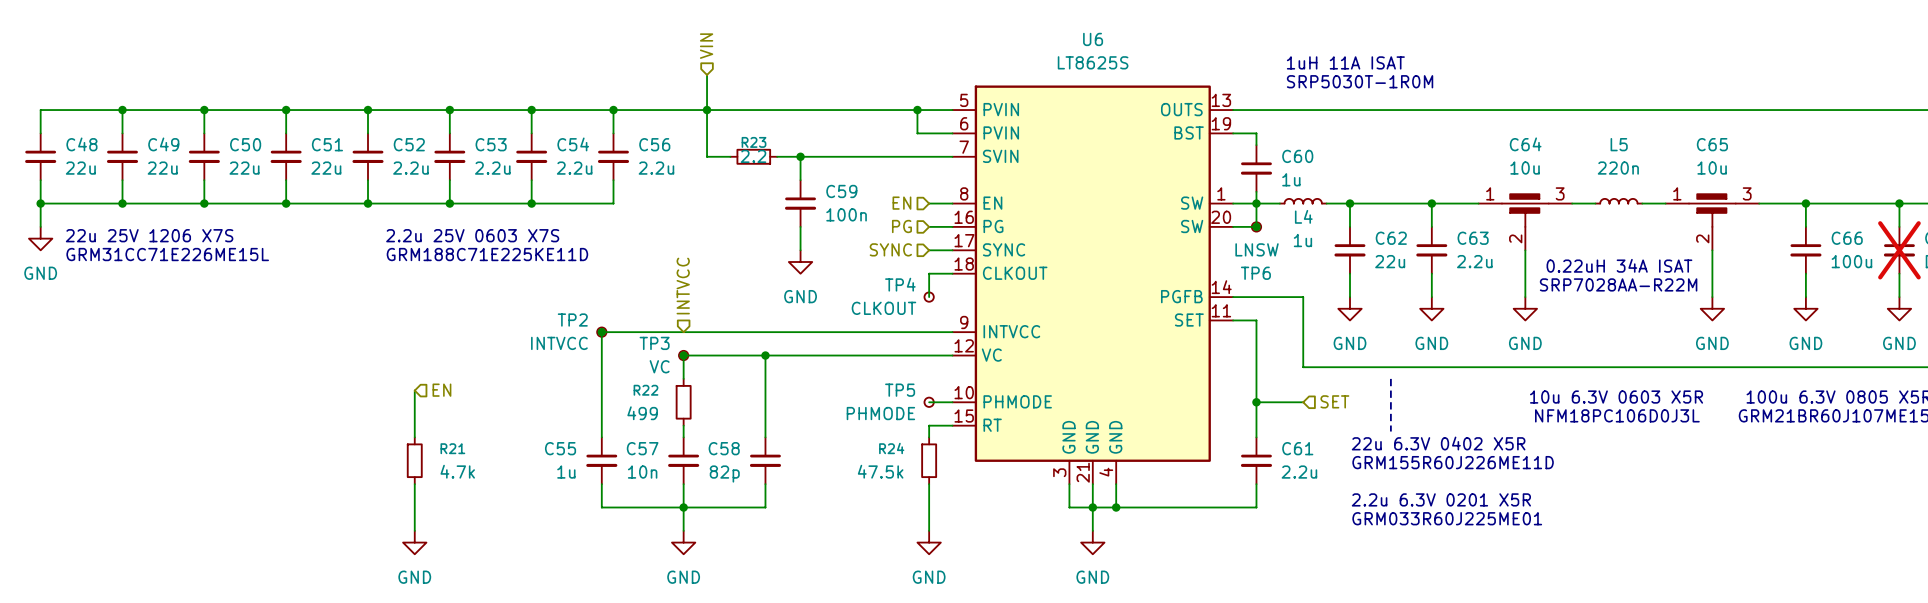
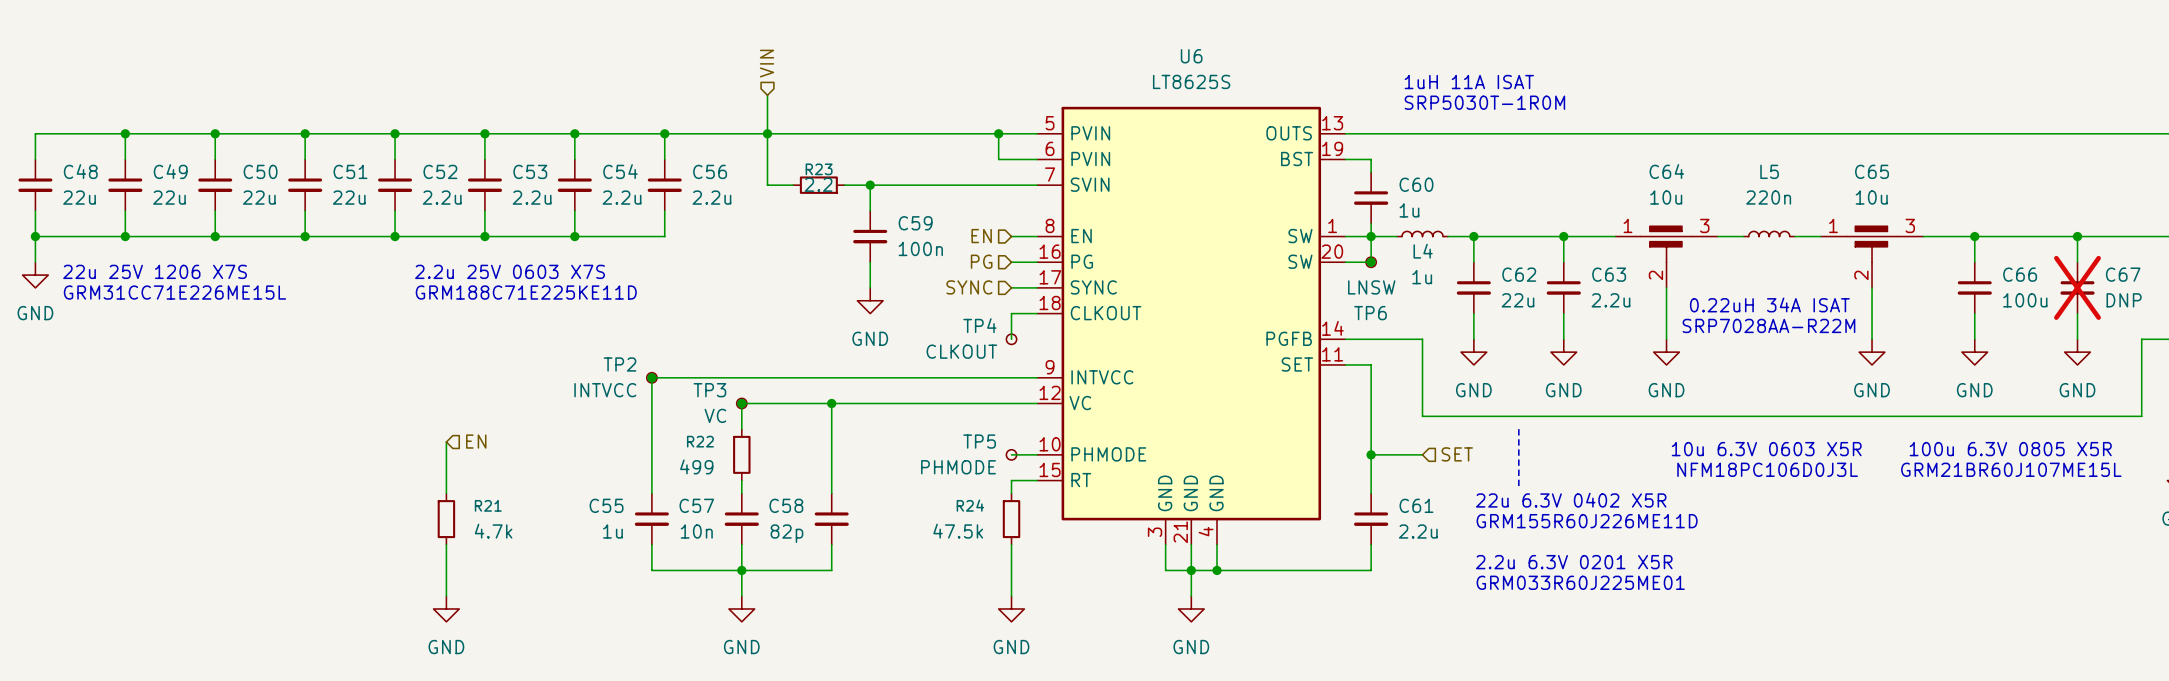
hierarchical label: INTVCC (683, 286) -> none

